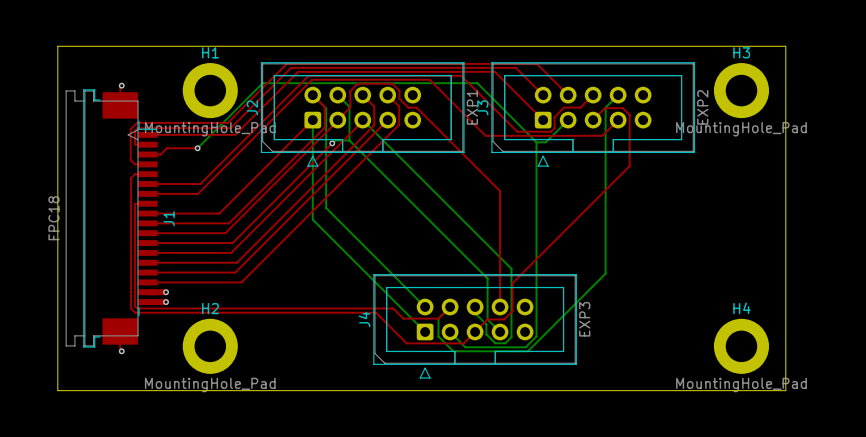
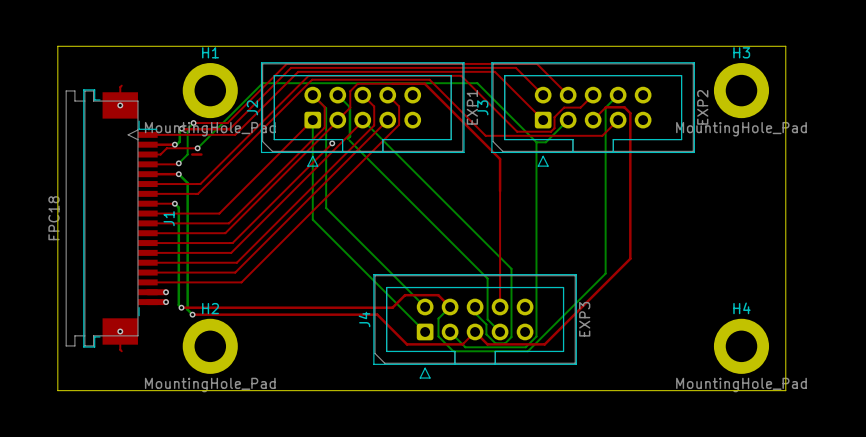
top track: (392, 83) (399, 90) (399, 98) (408, 107) (416, 107) (500, 191) -> (392, 83) (424, 83) (500, 159) (500, 191)
via position: (121, 85) -> (120, 105)
bottom track: (349, 106) (349, 140) (335, 140) (332, 143) -> (349, 106) (349, 136) (347, 138)
top track: (605, 108) (622, 108) (629, 115) (629, 166) (512, 283) (512, 311) (504, 319) (487, 319) (475, 331) -> (605, 108) (624, 107) (630, 113) (630, 258) (544, 344) (487, 344) (475, 331)
top track: (227, 122) (137, 122) (130, 129) (130, 160) (135, 164) (147, 164) -> (227, 122) (193, 123)
bottom track: none -> (193, 123) (187, 128) (187, 154) (178, 163)
via: none -> (193, 123)
bottom track: none -> (181, 128) (179, 130) (179, 141) (174, 144)
via: none -> (181, 128)
top track: (230, 128) (137, 128) (135, 130) (135, 144) (147, 144) -> (230, 128) (181, 128)
top track: none -> (147, 144) (174, 144)
via: none -> (174, 144)
top track: none -> (192, 154) (201, 154)
top track: none -> (178, 163) (147, 164)
via: none -> (178, 163)
top track: none -> (177, 173) (147, 174)
top track: (147, 174) (135, 174) (131, 178) (131, 308) (135, 312) (376, 312) (406, 343) (463, 343) -> (192, 314) (377, 314) (407, 344) (463, 343)
bottom track: none -> (178, 174) (187, 183) (187, 309) (192, 314)
via: none -> (178, 174)
top track: (147, 203) (135, 203) (135, 306) (137, 308) (393, 308) (403, 318) (438, 318) (450, 306) -> (181, 307) (392, 307) (405, 295) (438, 295) (450, 306)
top track: none -> (147, 203) (174, 203)
bottom track: none -> (174, 203) (178, 207) (178, 305) (181, 307)
via: none -> (174, 203)
via: none -> (181, 307)
via: none -> (192, 314)
via position: (121, 351) -> (120, 331)

